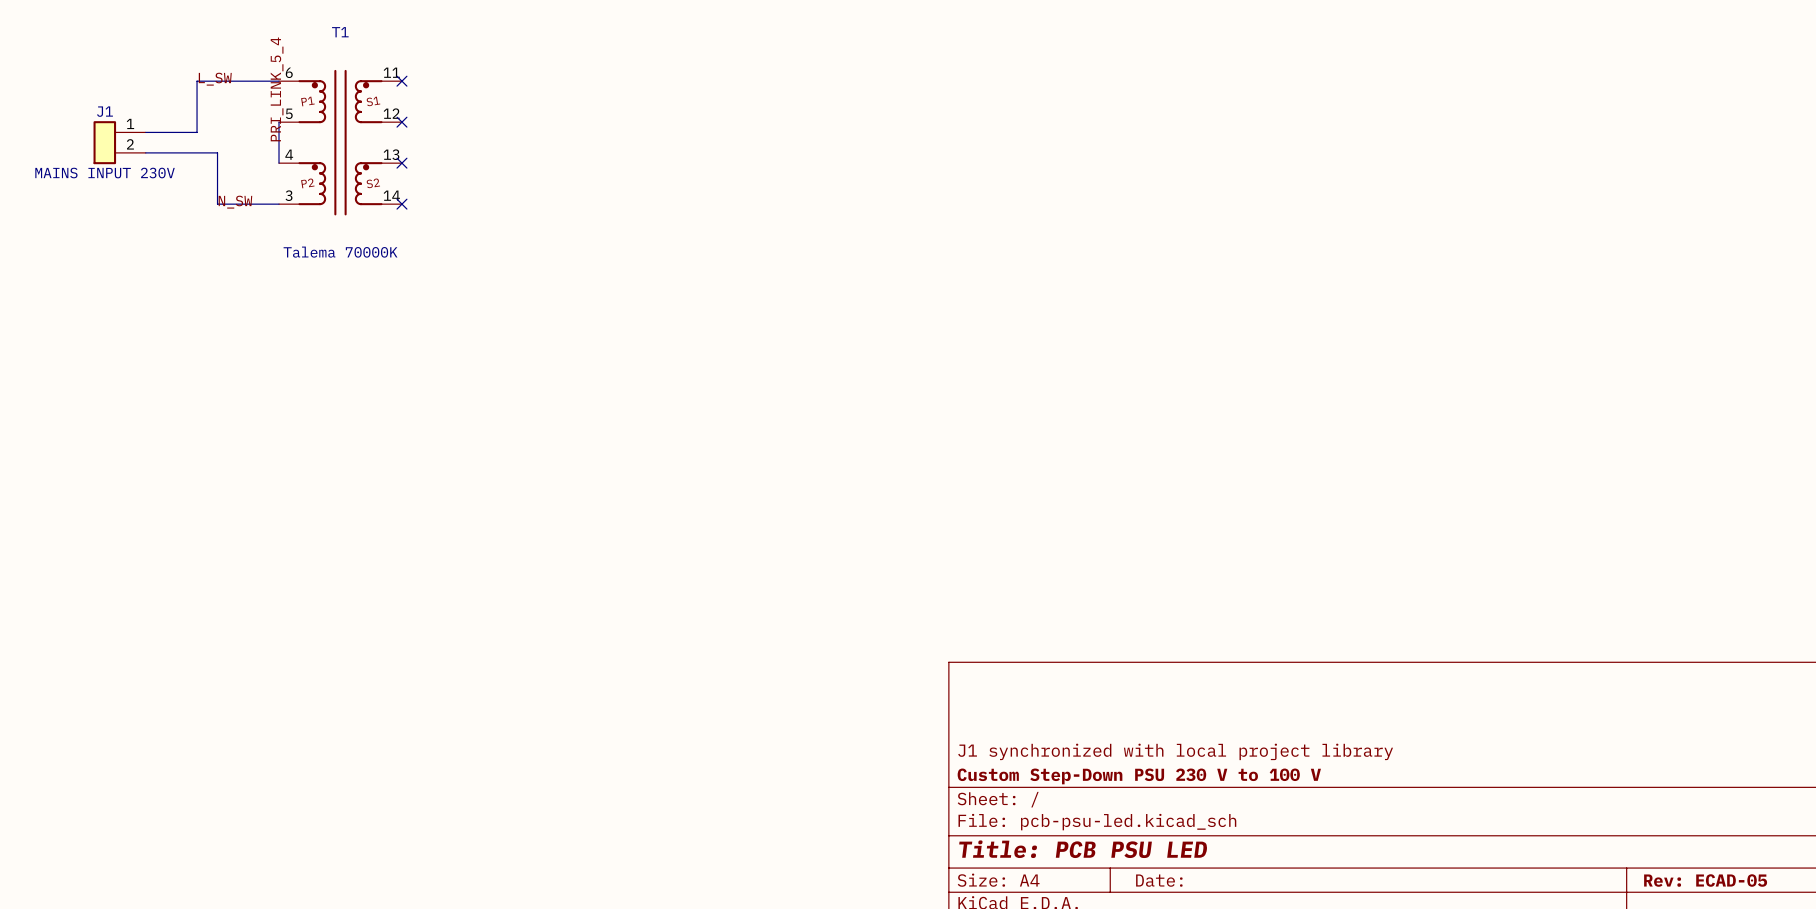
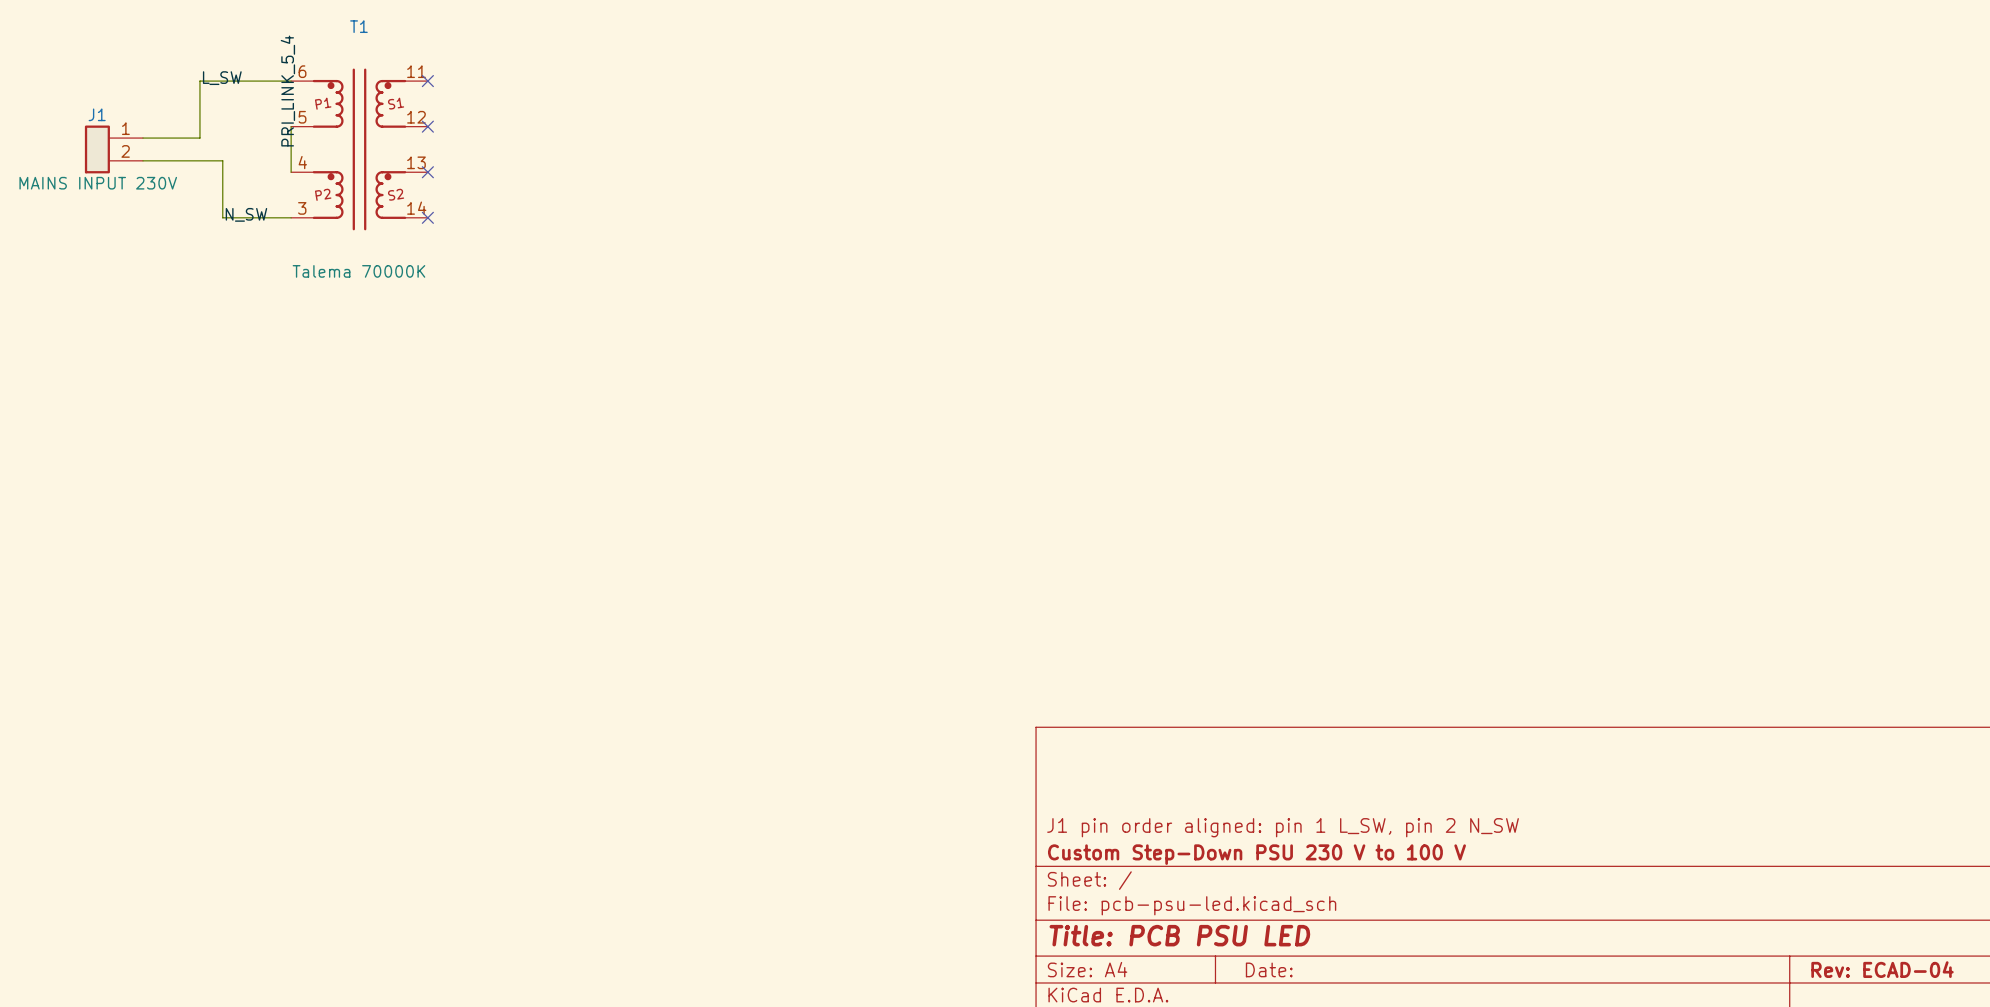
title block: J1 synchronized with local project library (1175, 751) -> J1 pin order aligned: pin 1 L_SW, pin 2 N_SW (1283, 827)
title block: Rev: ECAD-05 (1705, 880) -> Rev: ECAD-04 (1882, 969)

